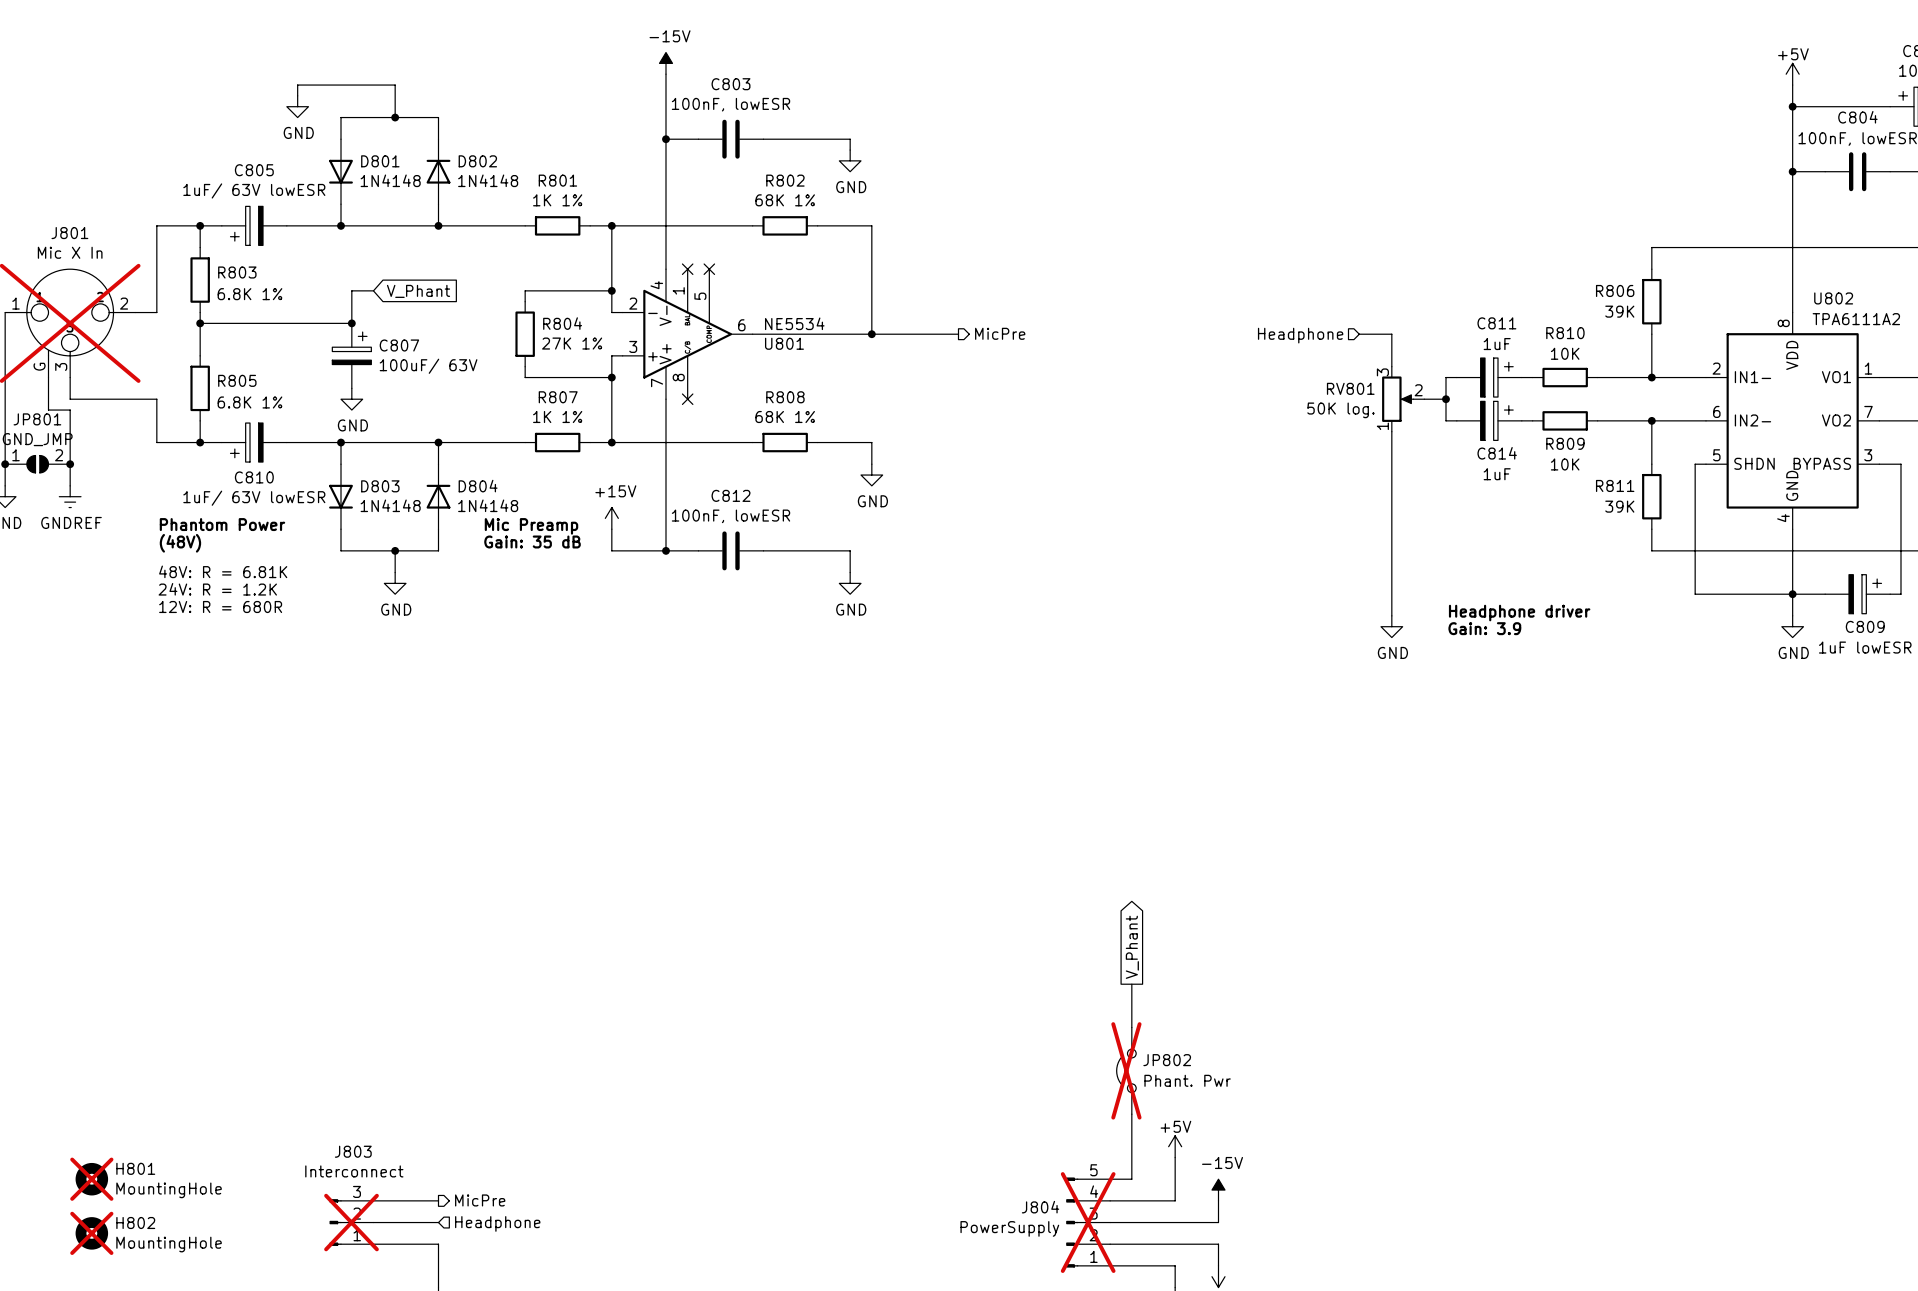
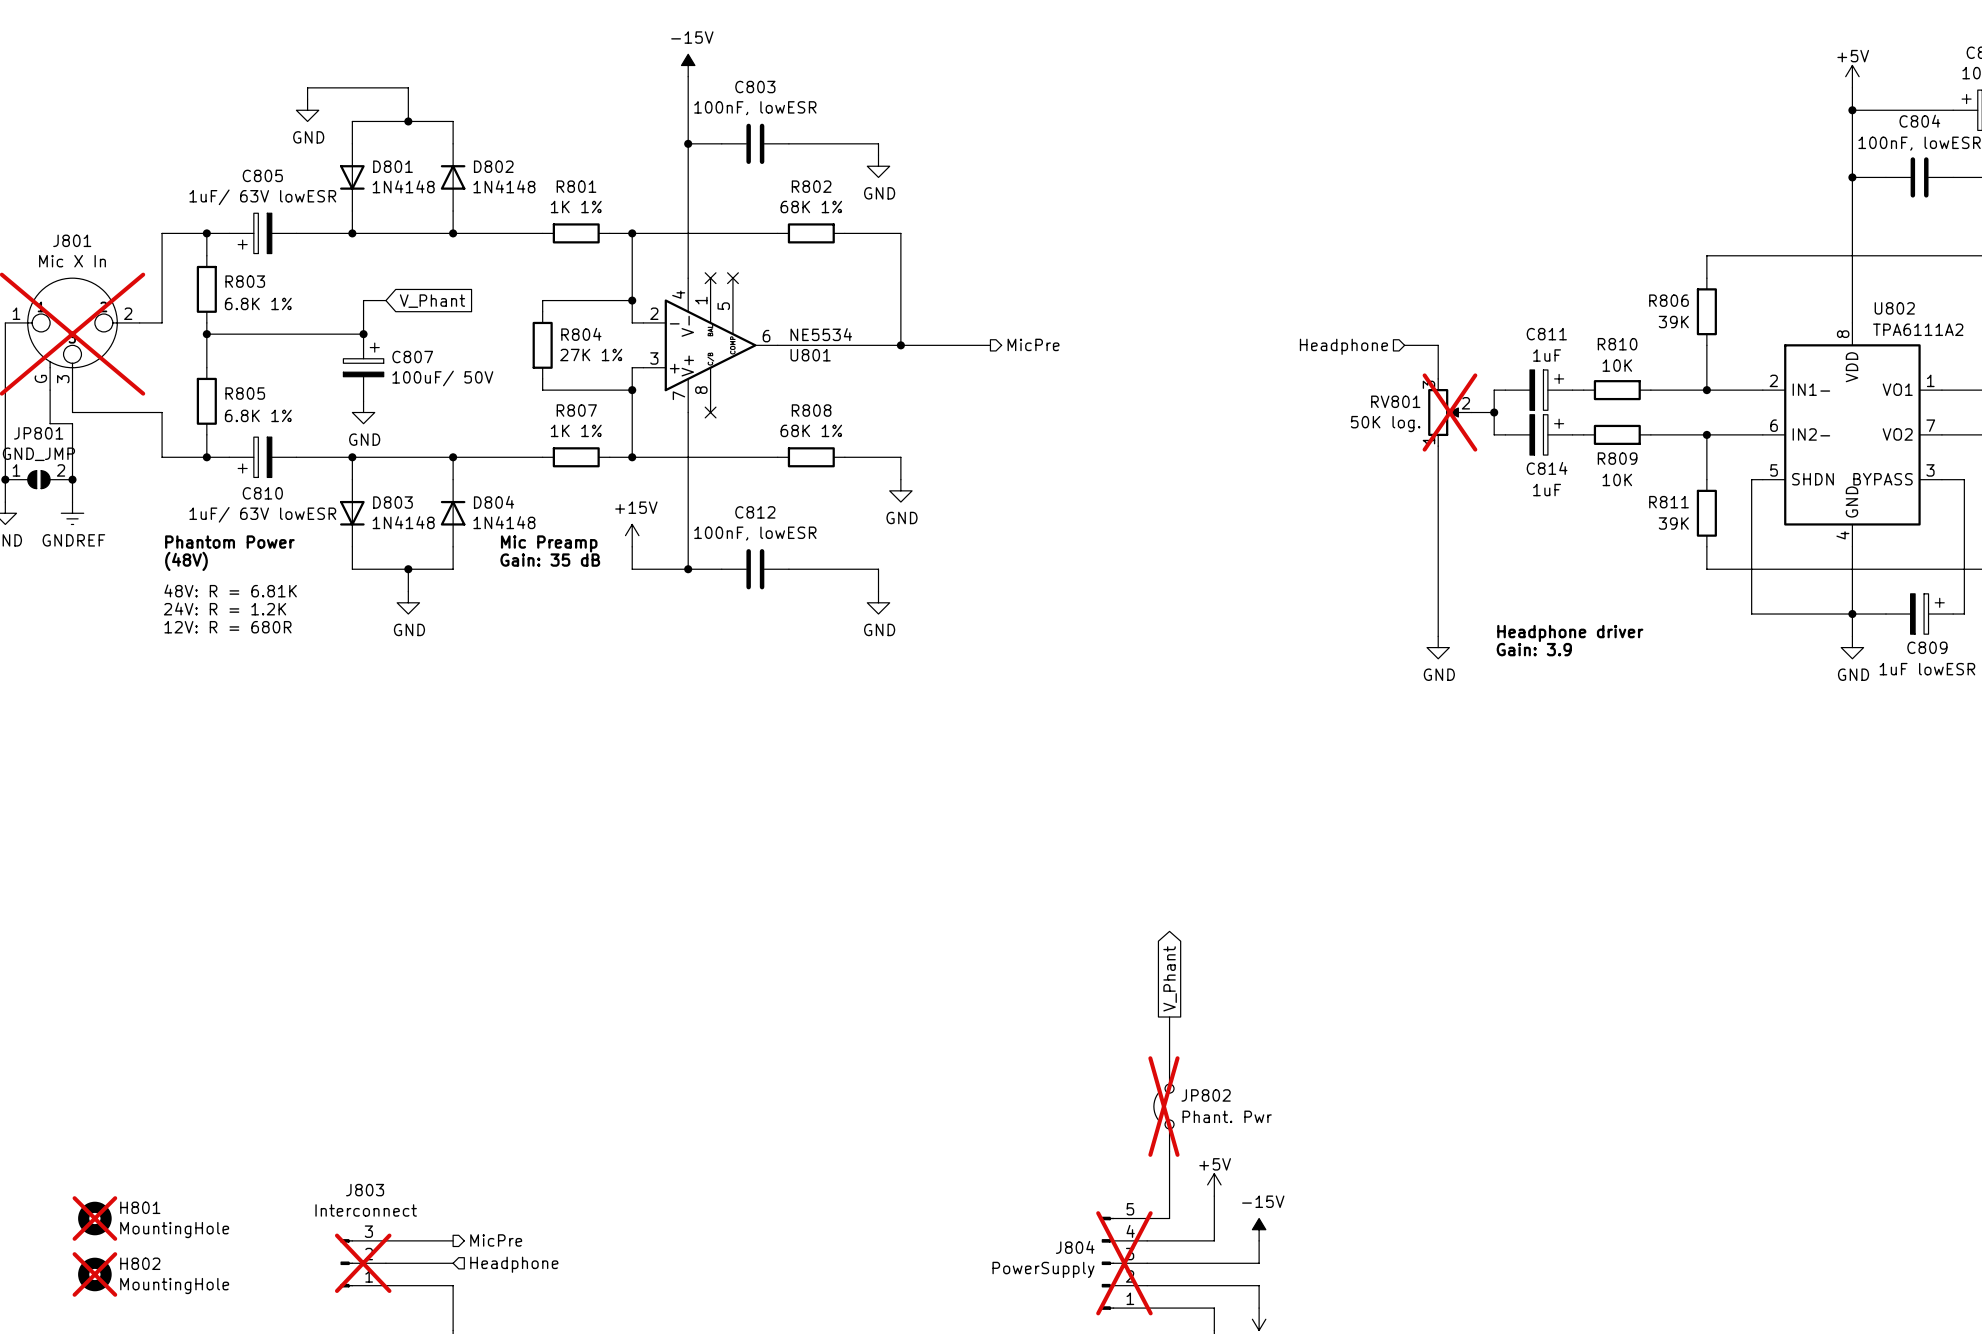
C807 value: 100uF/ 63V (428, 366) -> 100uF/ 50V (442, 378)
RV801 do-not-place cross: none -> (1449, 412)

